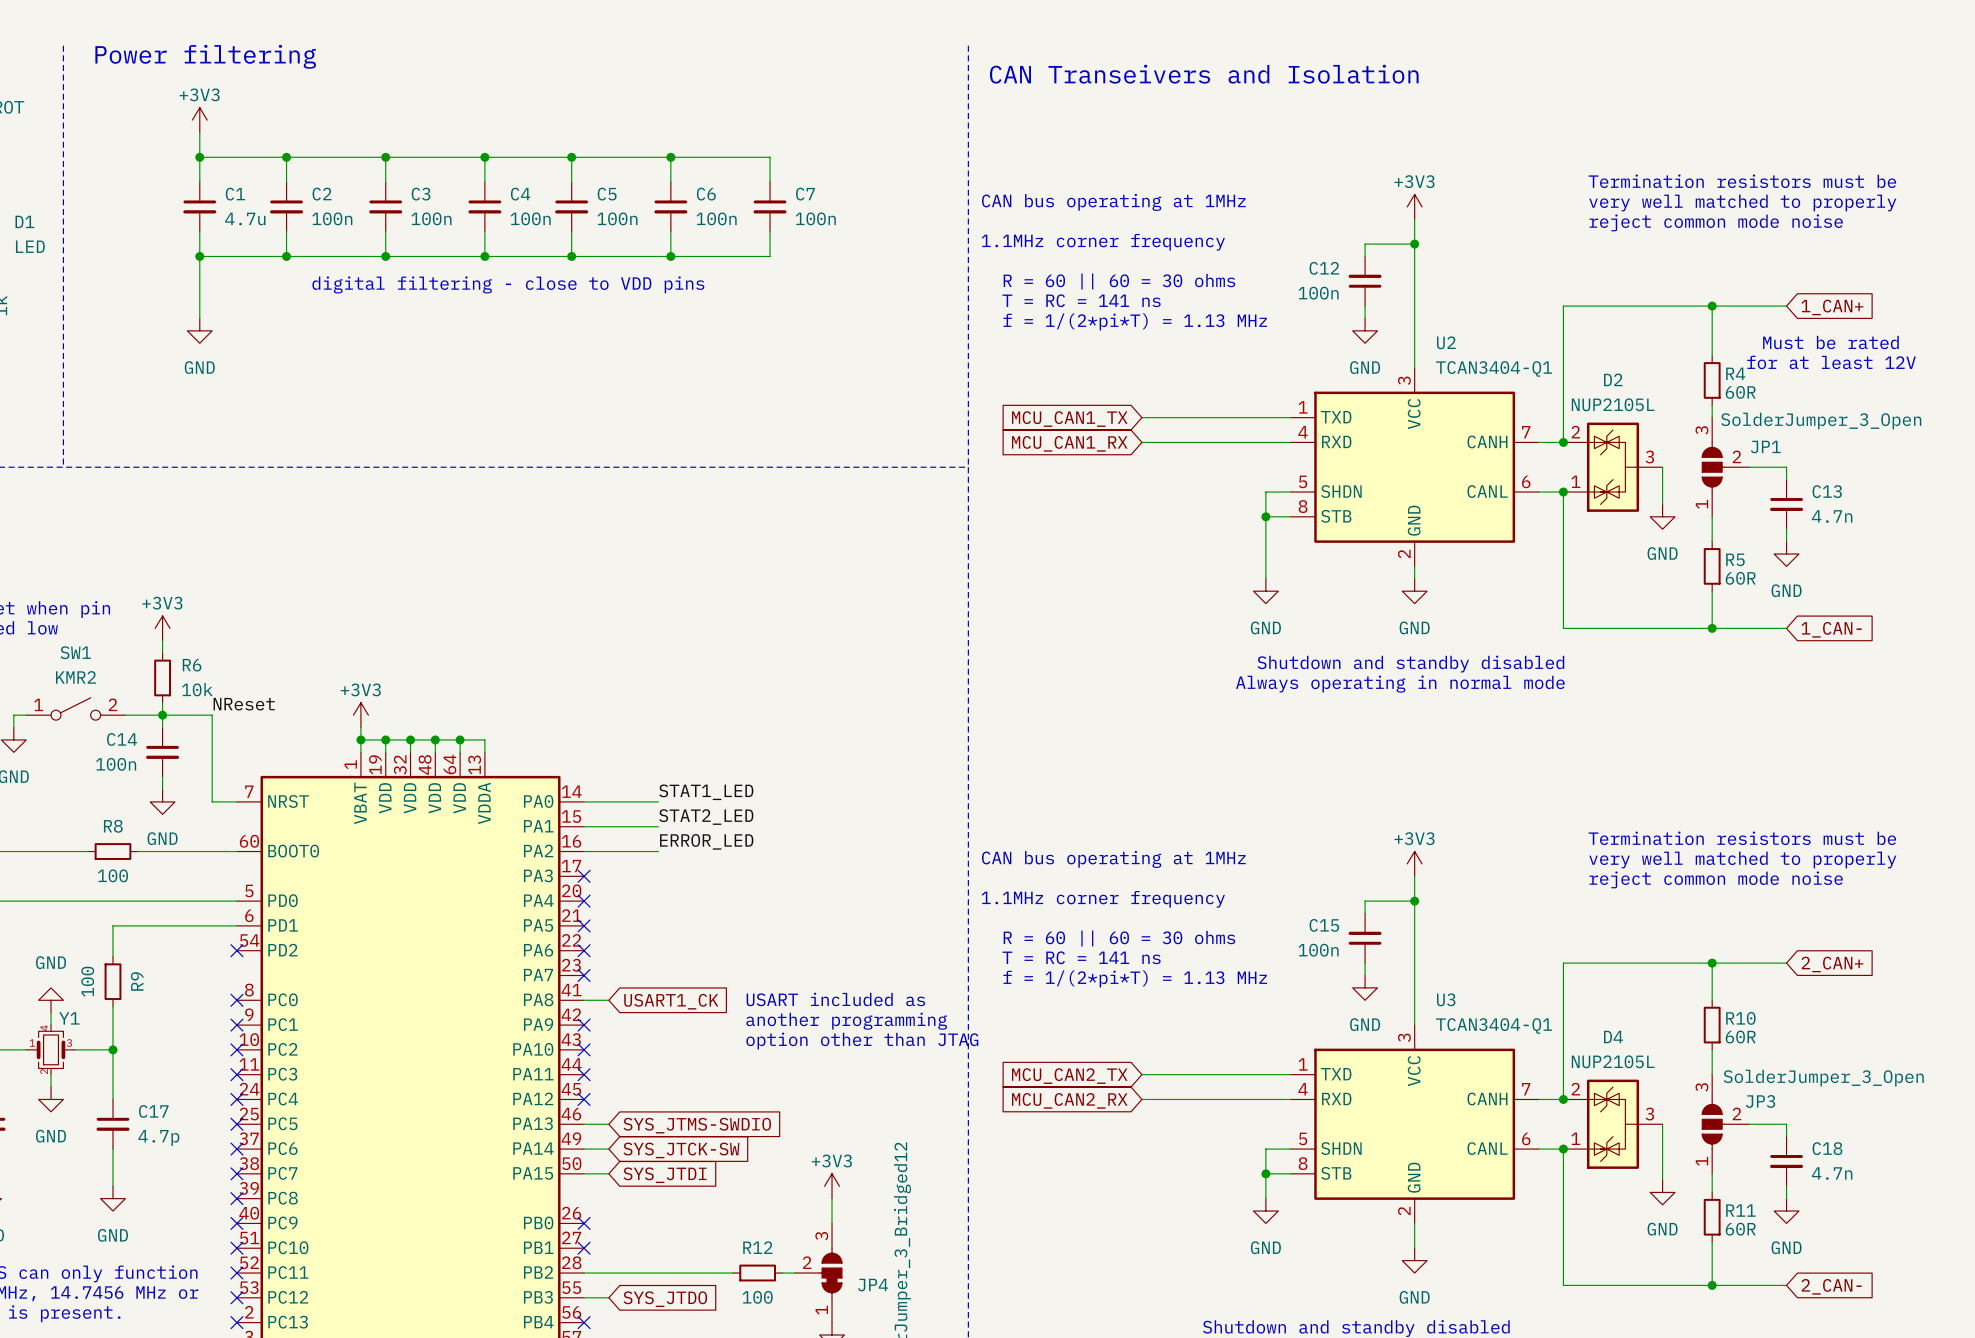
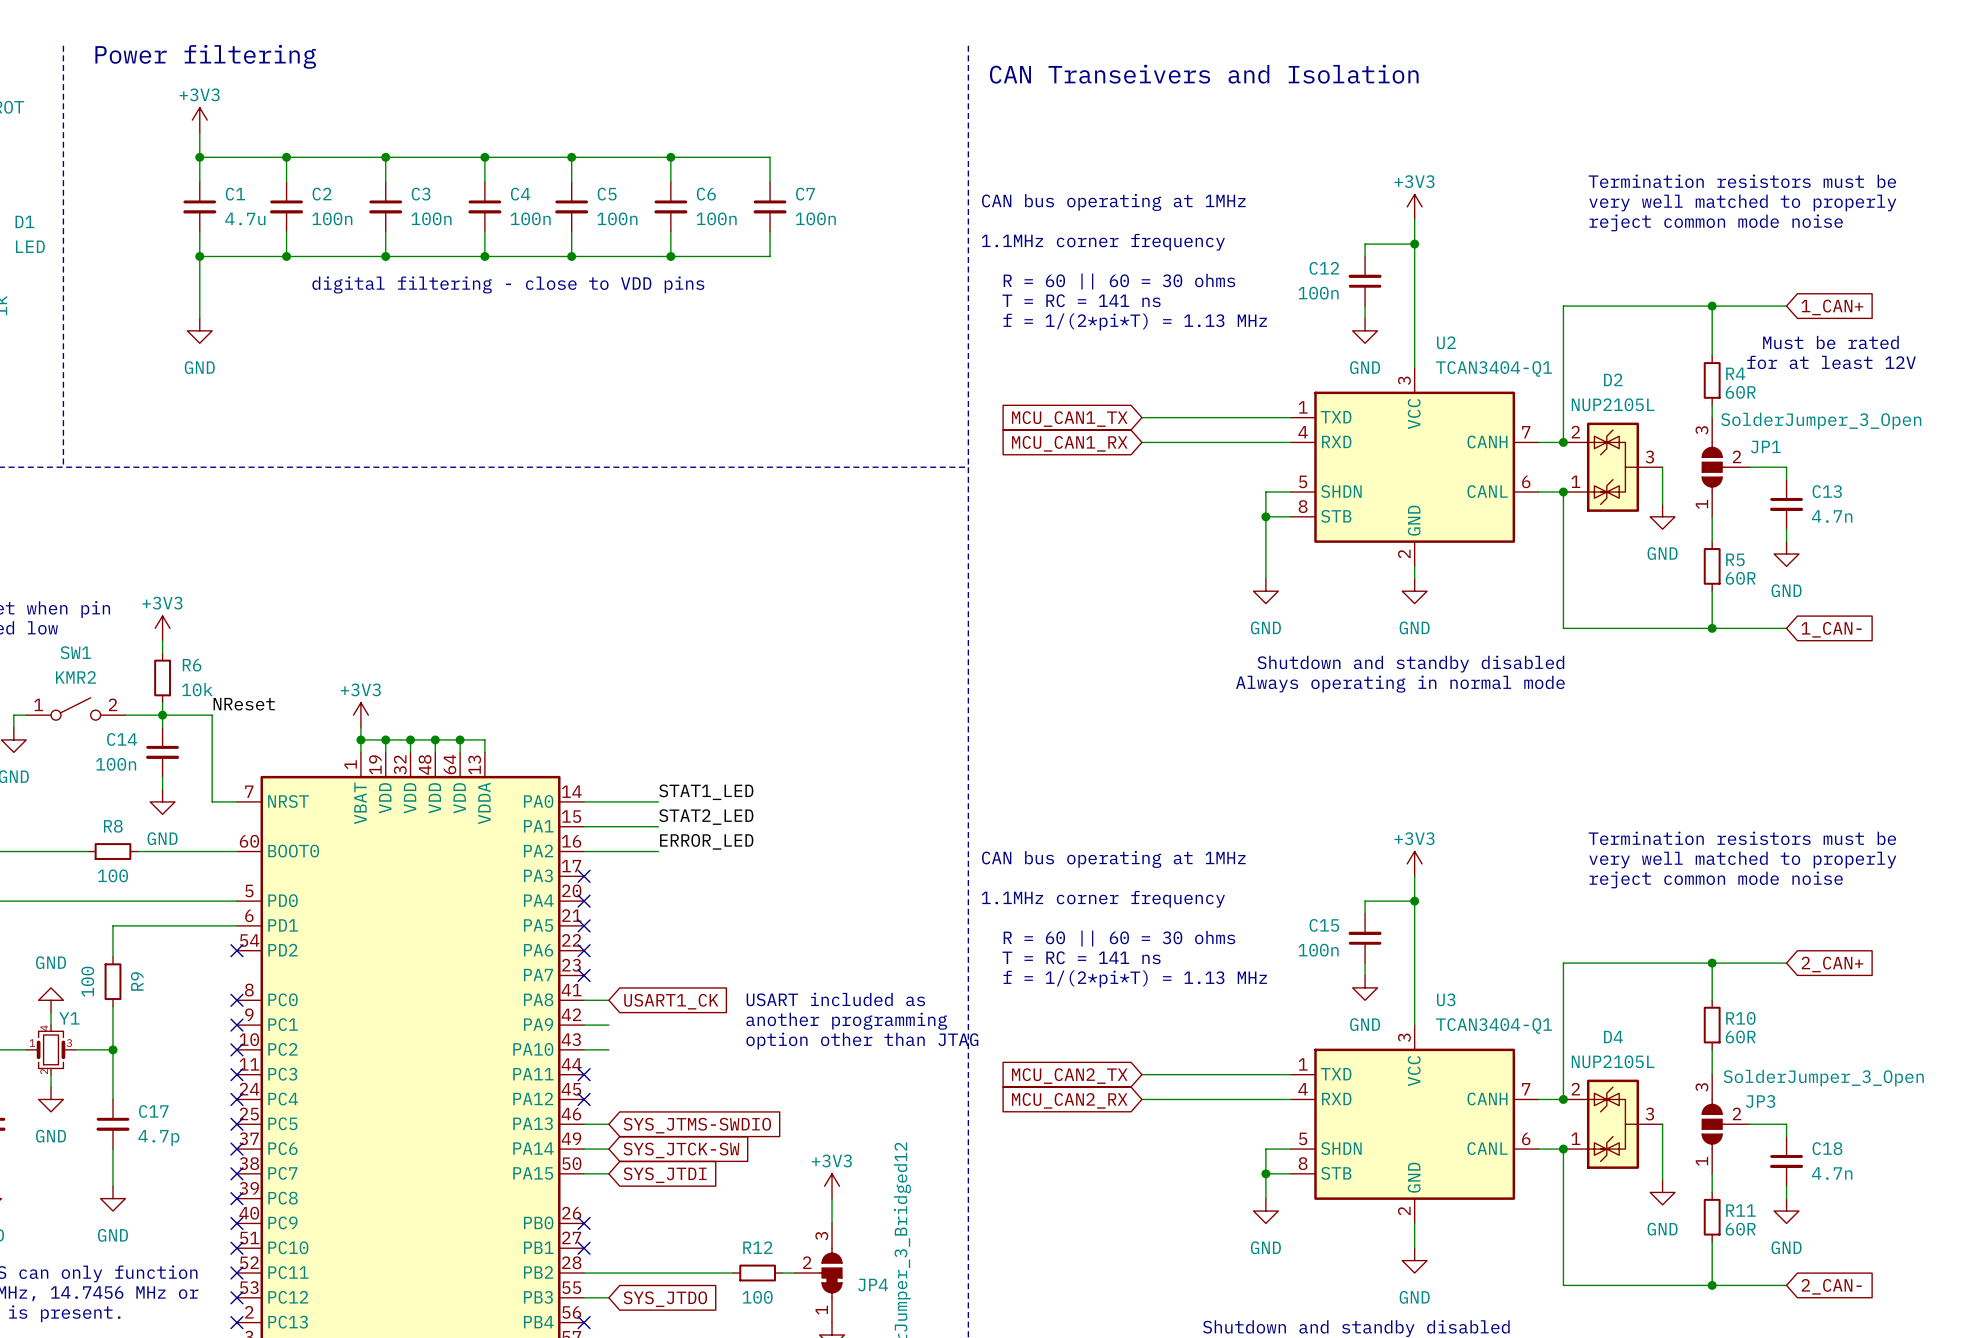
wire: none -> (584, 1025) (608, 1025)
no-connect mark: (584, 1025) -> none
wire: none -> (584, 1049) (608, 1049)
no-connect mark: (584, 1049) -> none

